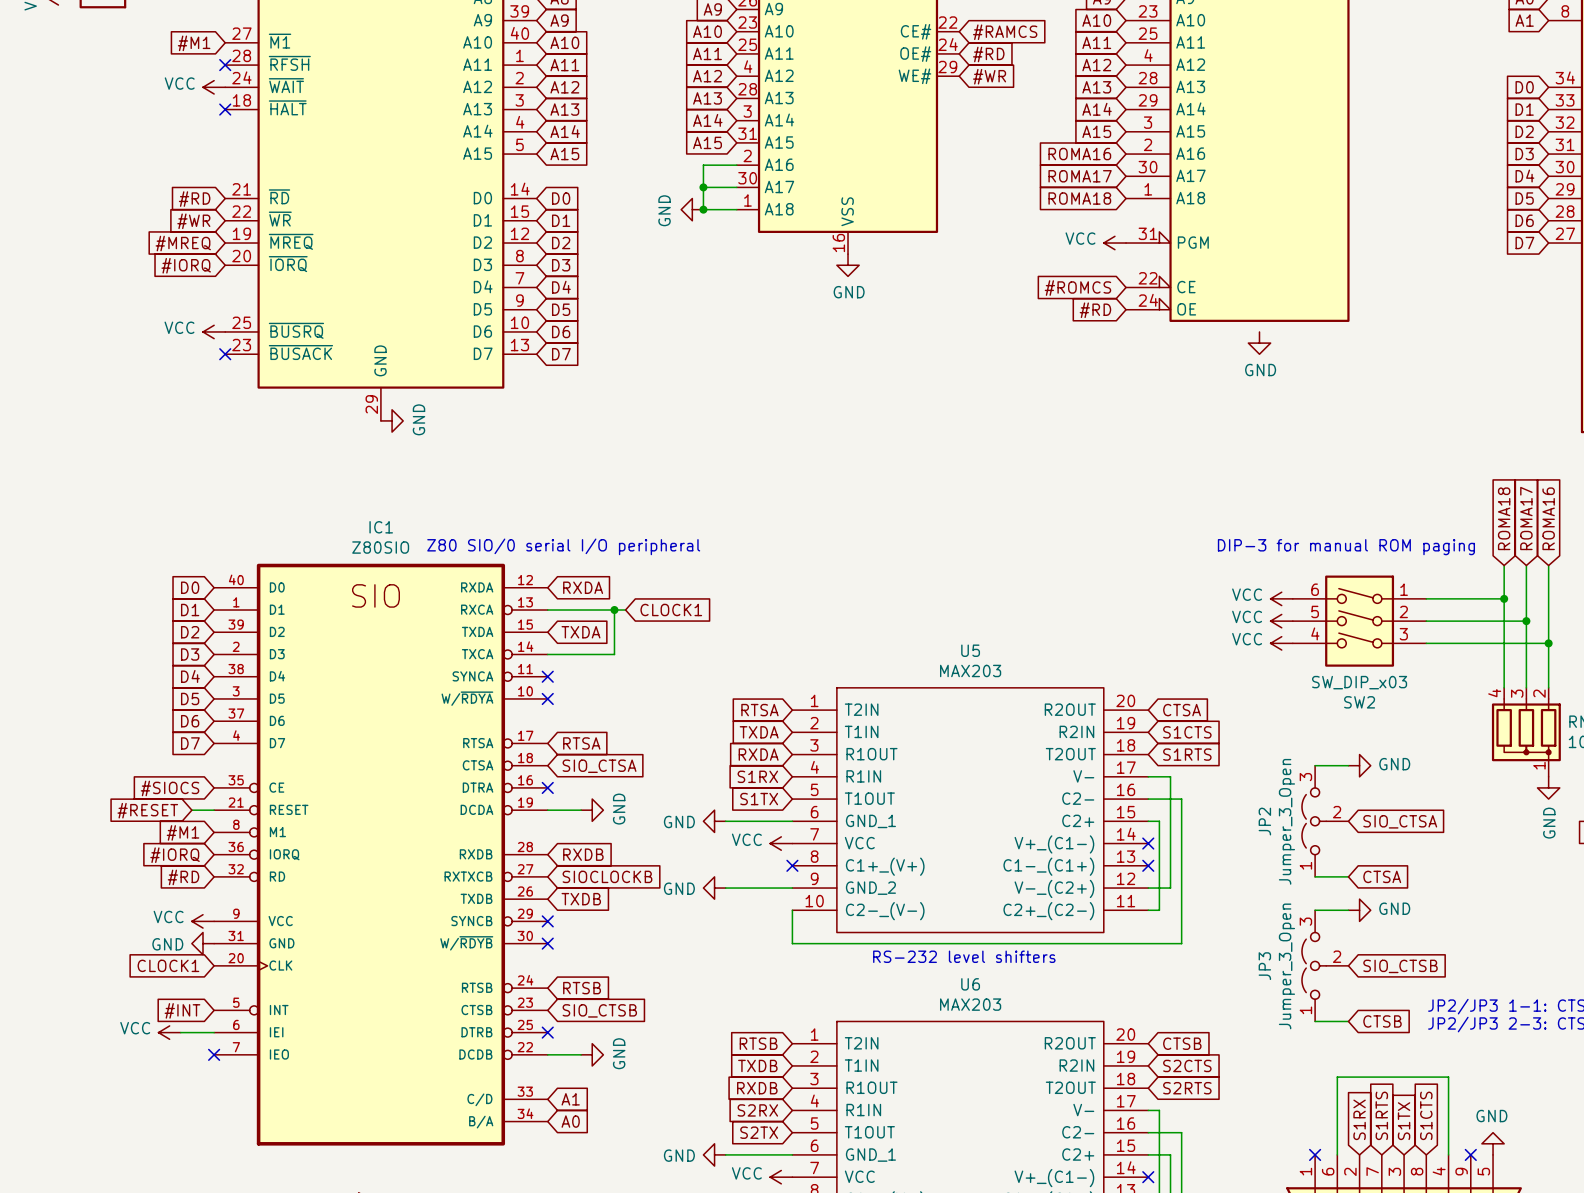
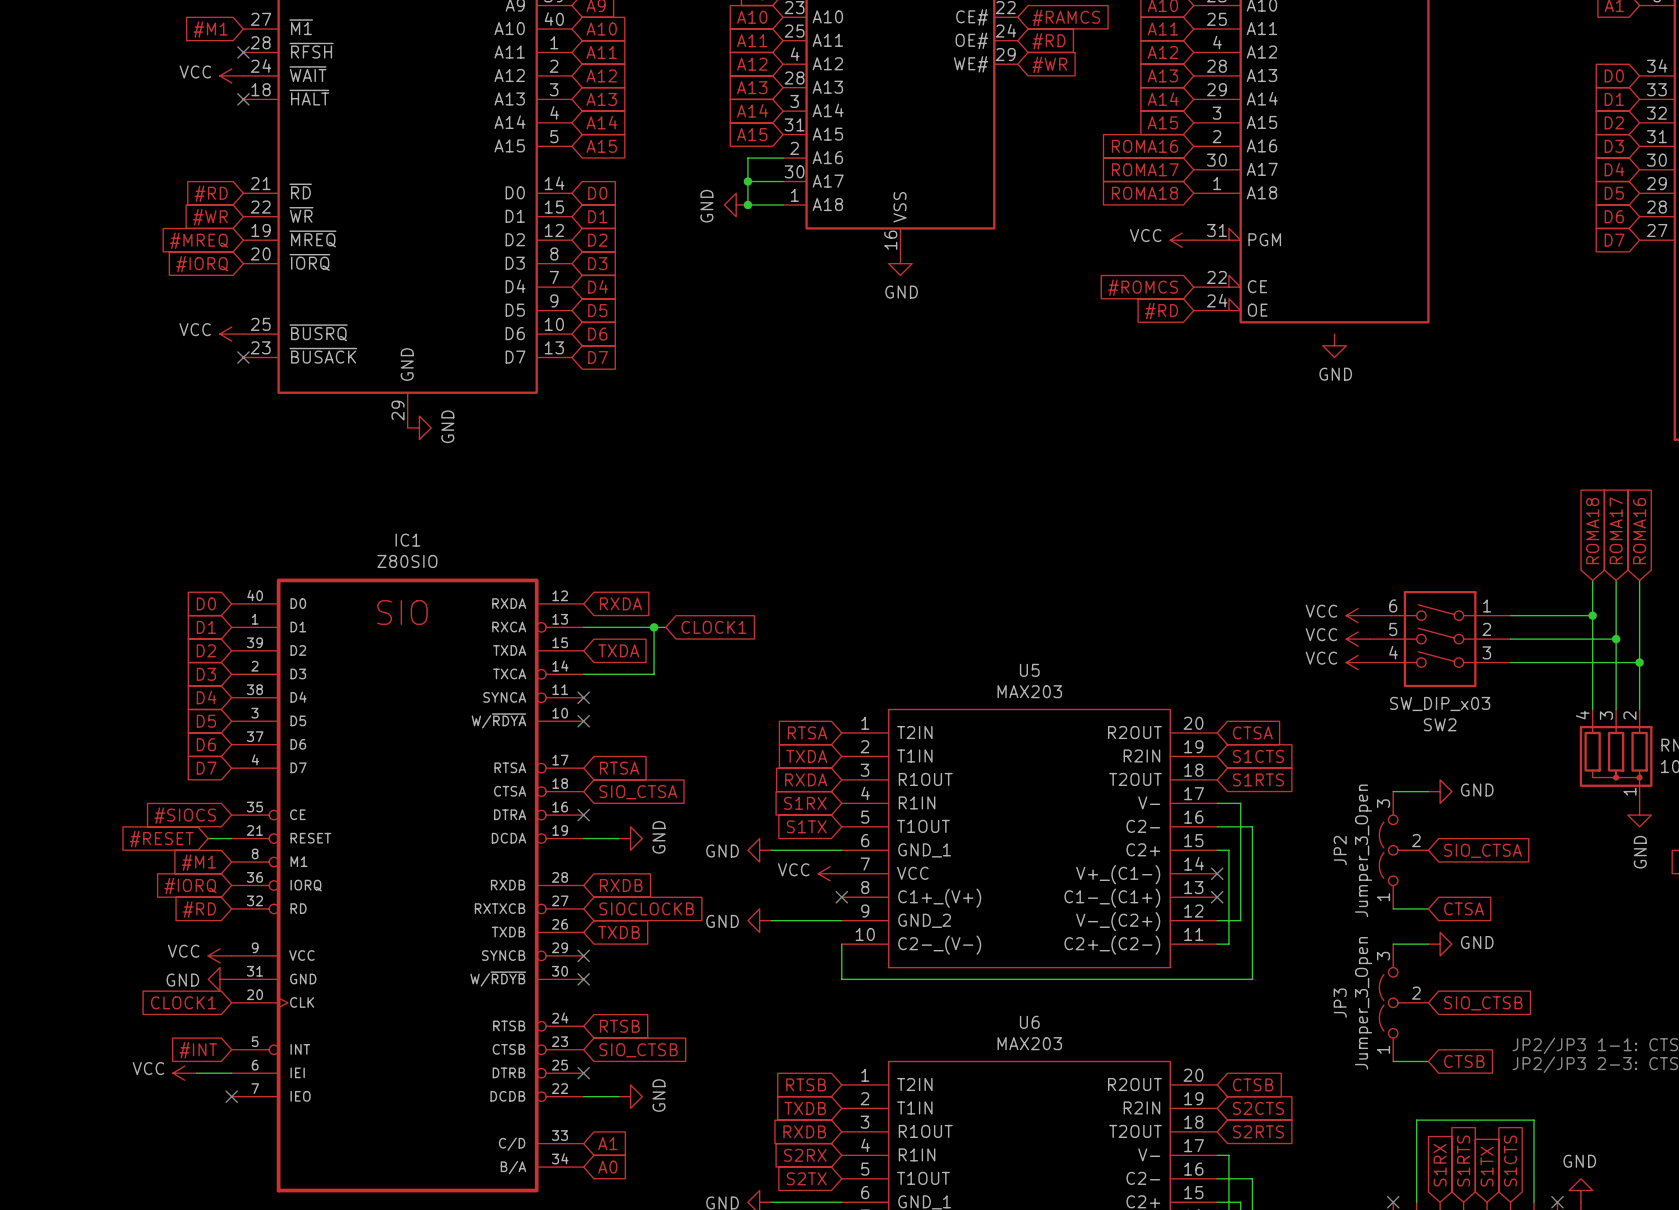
text: Z80 SIO/0 serial I/O peripheral (563, 546) -> none
text: DIP-3 for manual ROM paging (1346, 547) -> none
text: RS-232 level shifters (964, 956) -> none

